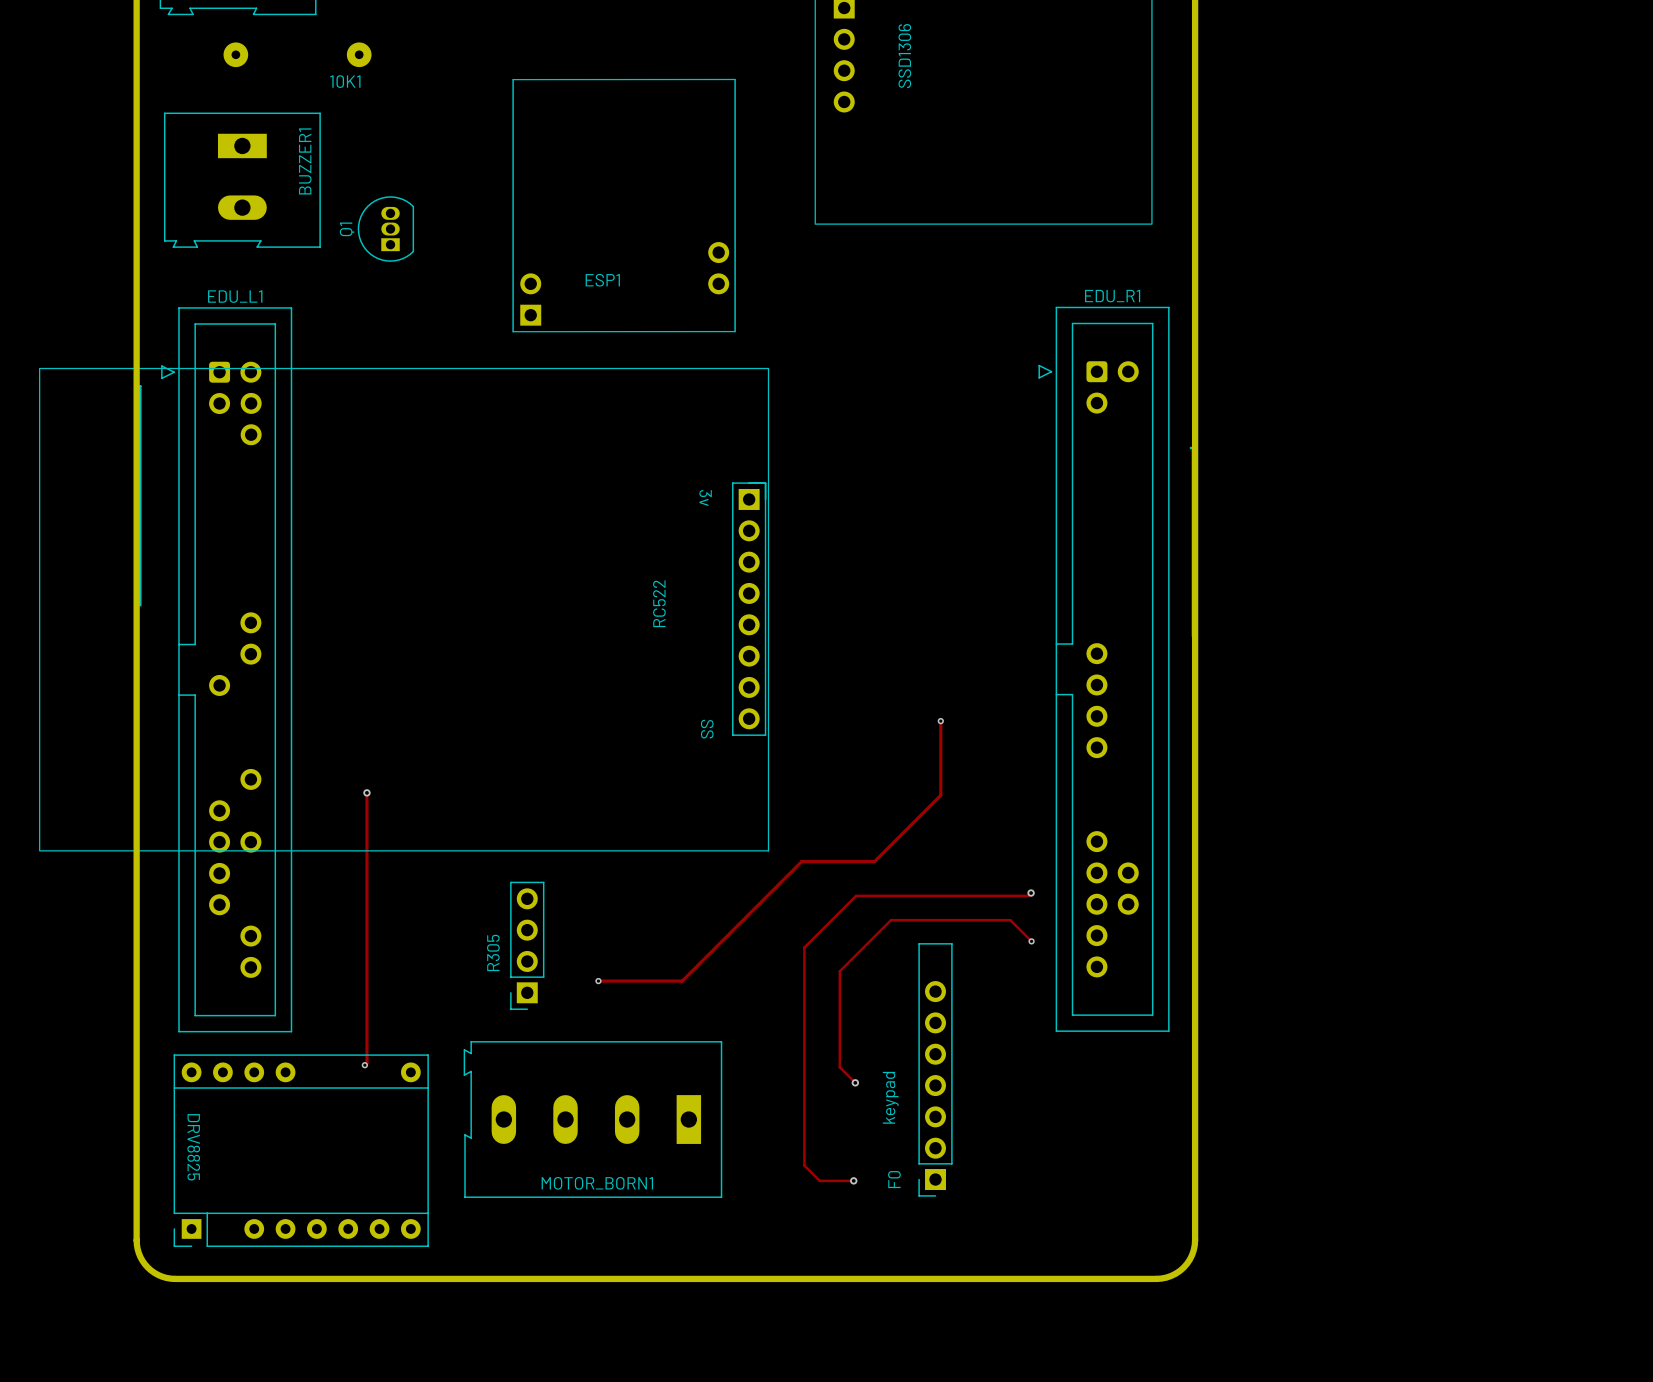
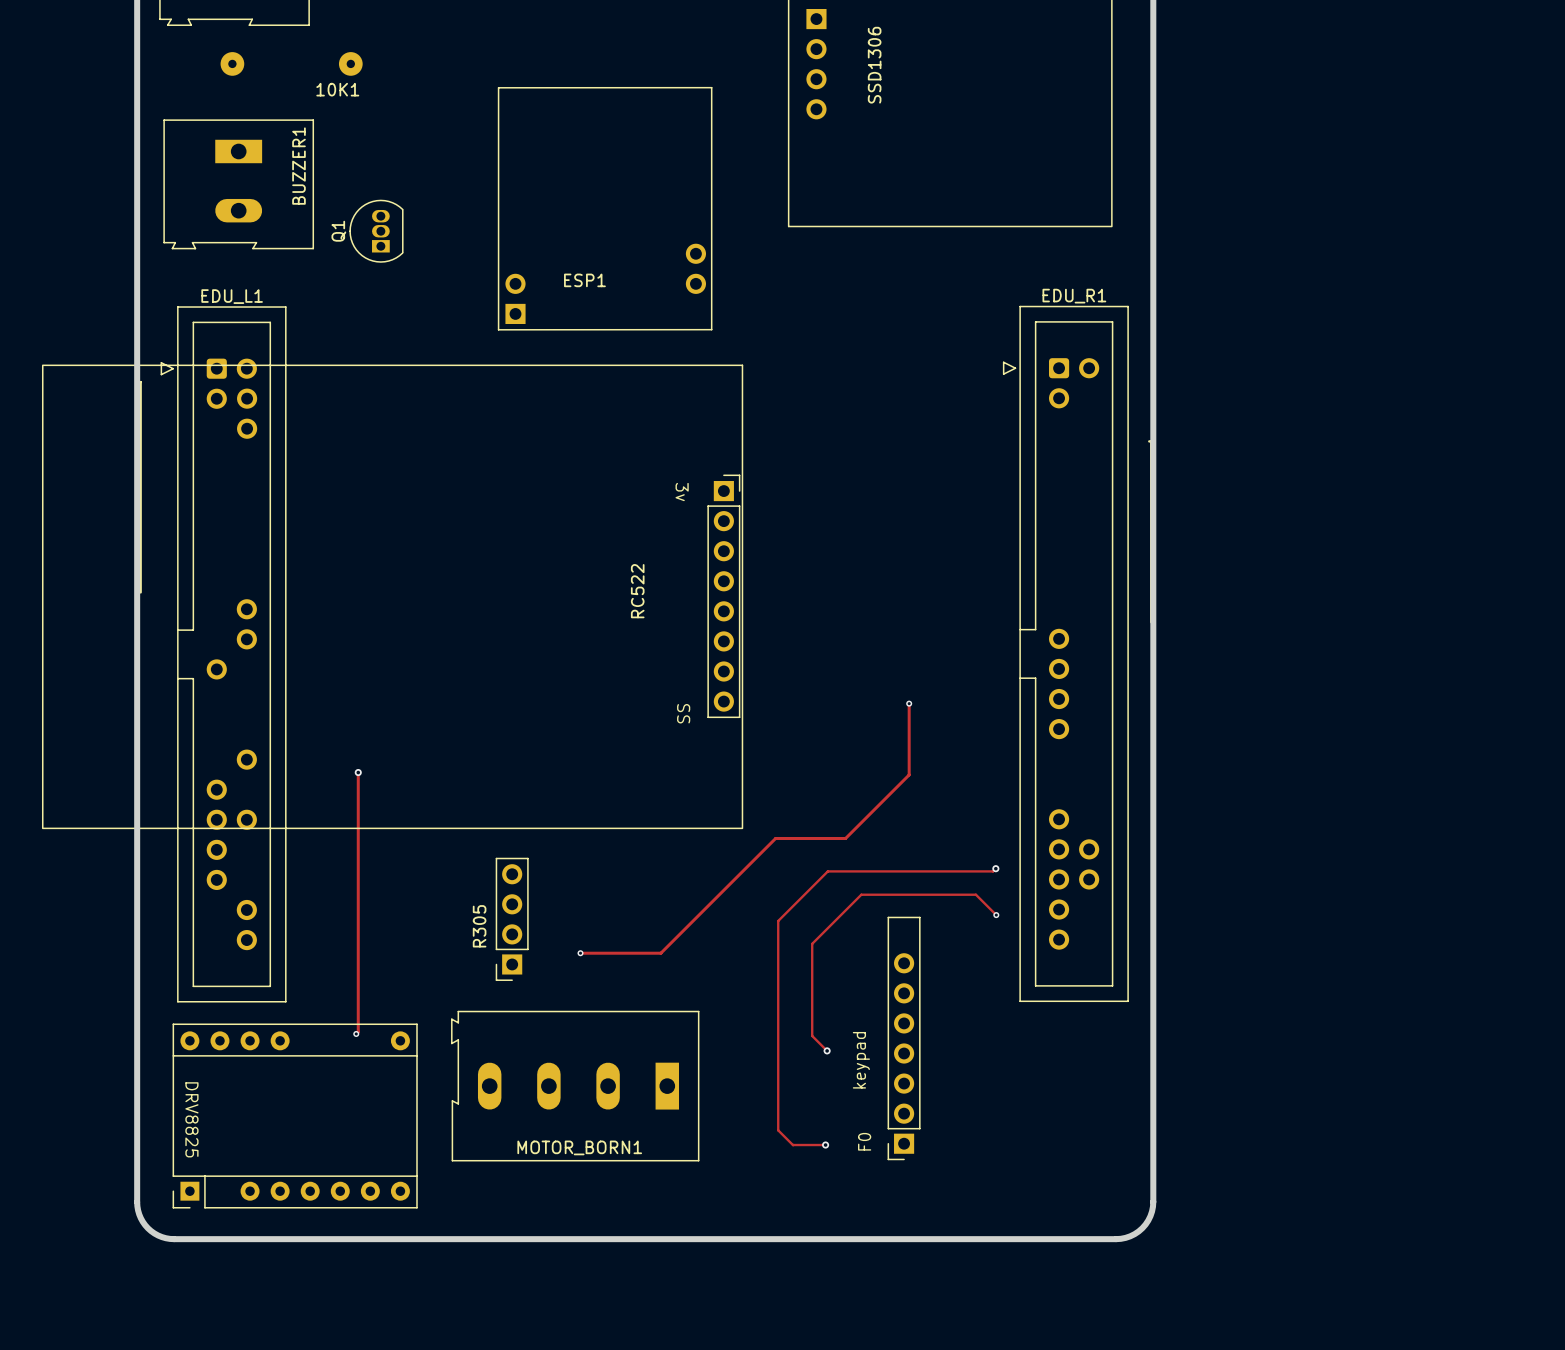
RC522 footprint: [39, 367, 770, 852] -> [42, 364, 744, 829]

